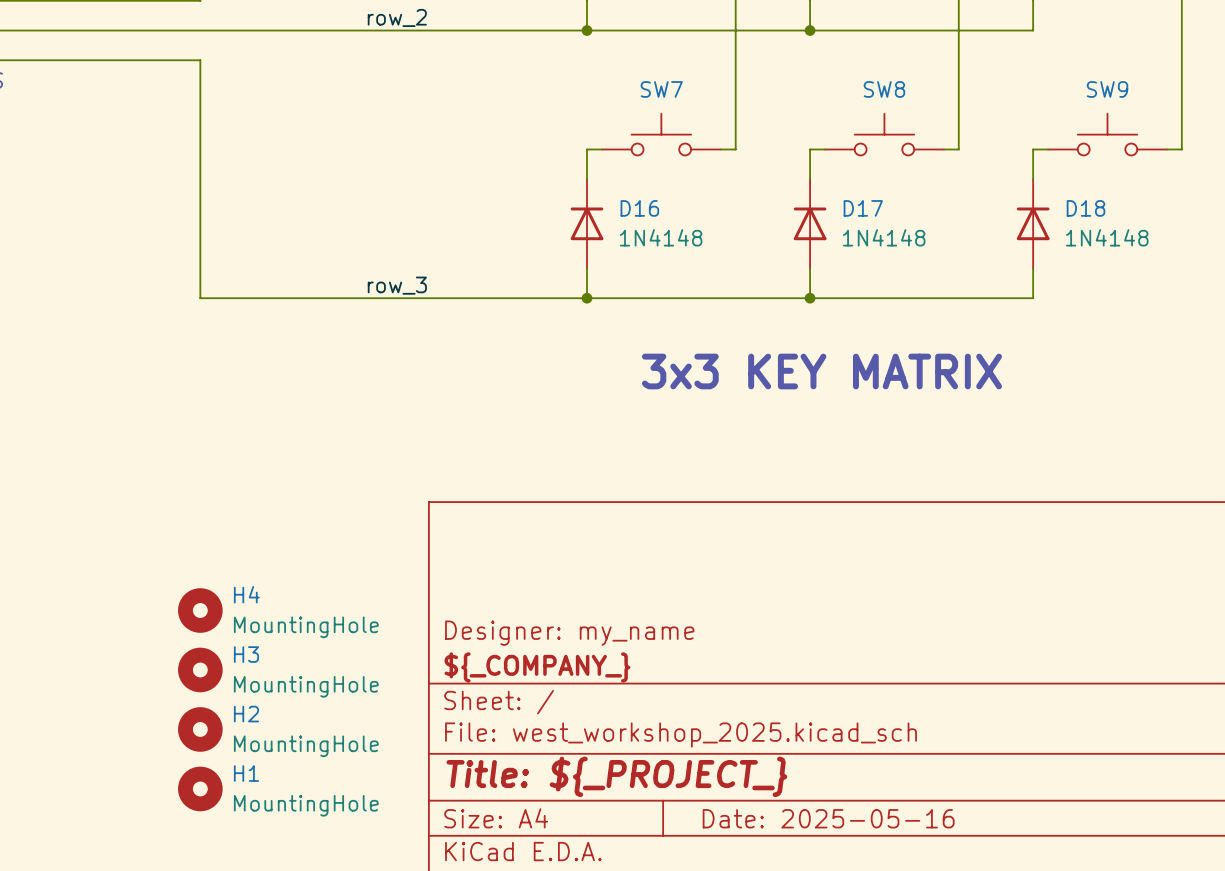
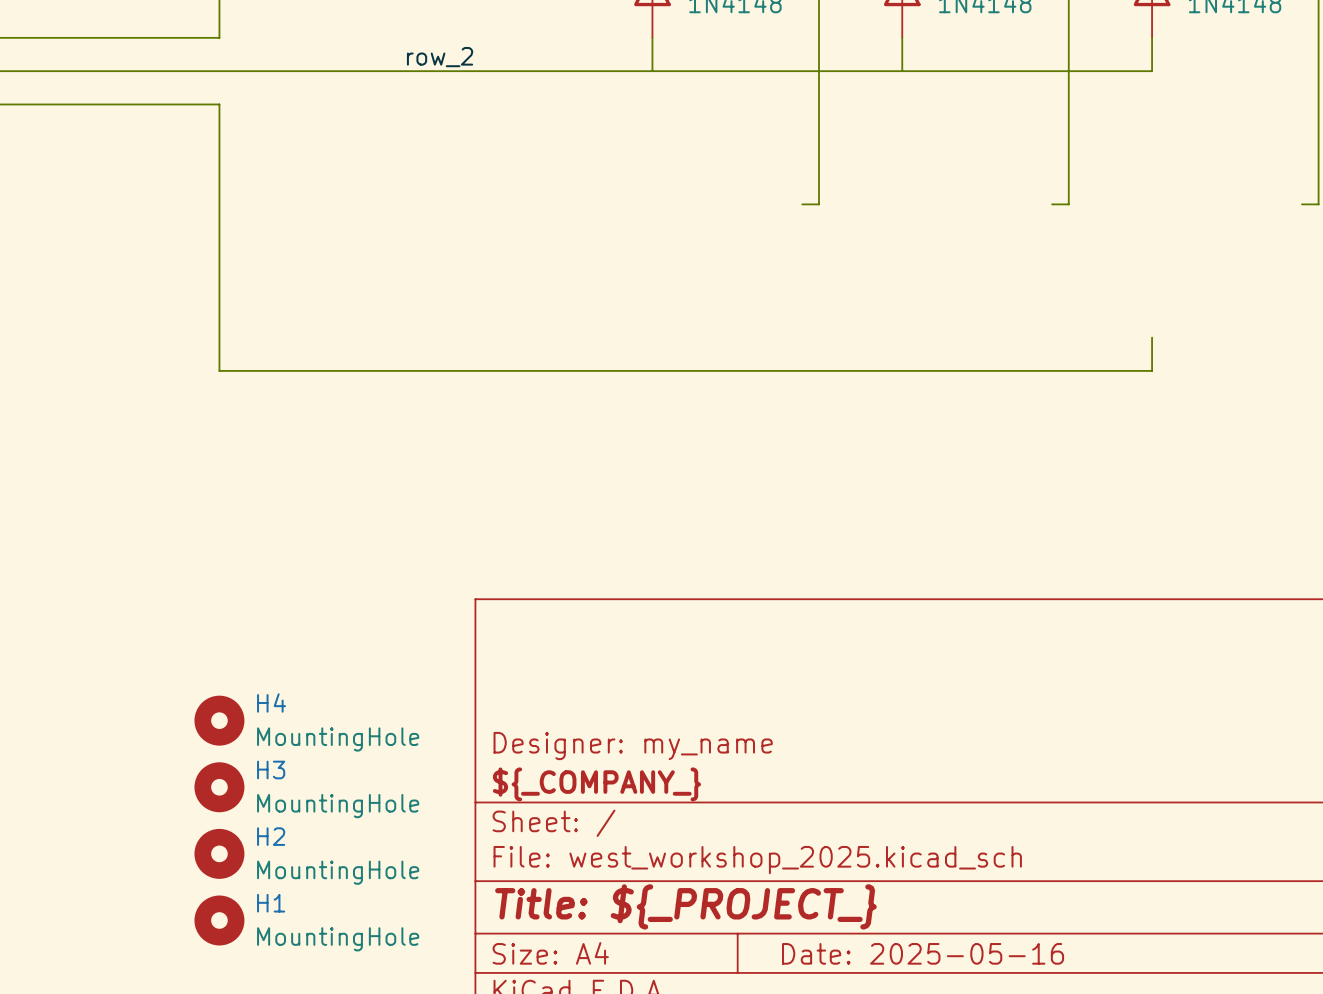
junction: (587, 30) -> none
junction: (810, 30) -> none
SW7: (661, 134) -> none
SW8: (884, 134) -> none
SW9: (1107, 134) -> none
wire: (601, 149) (587, 149) (587, 179) -> none
wire: (824, 149) (810, 149) (810, 179) -> none
wire: (1048, 149) (1033, 149) (1033, 179) -> none
D16: 1N4148 (587, 223) -> none
D17: 1N4148 (810, 223) -> none
D18: 1N4148 (1033, 223) -> none
wire: (587, 268) (587, 298) -> none
wire: (810, 268) (810, 298) -> none
label: row_3 (397, 285) -> none
junction: (587, 298) -> none
junction: (810, 298) -> none
text: 3x3 KEY MATRIX (821, 371) -> none

